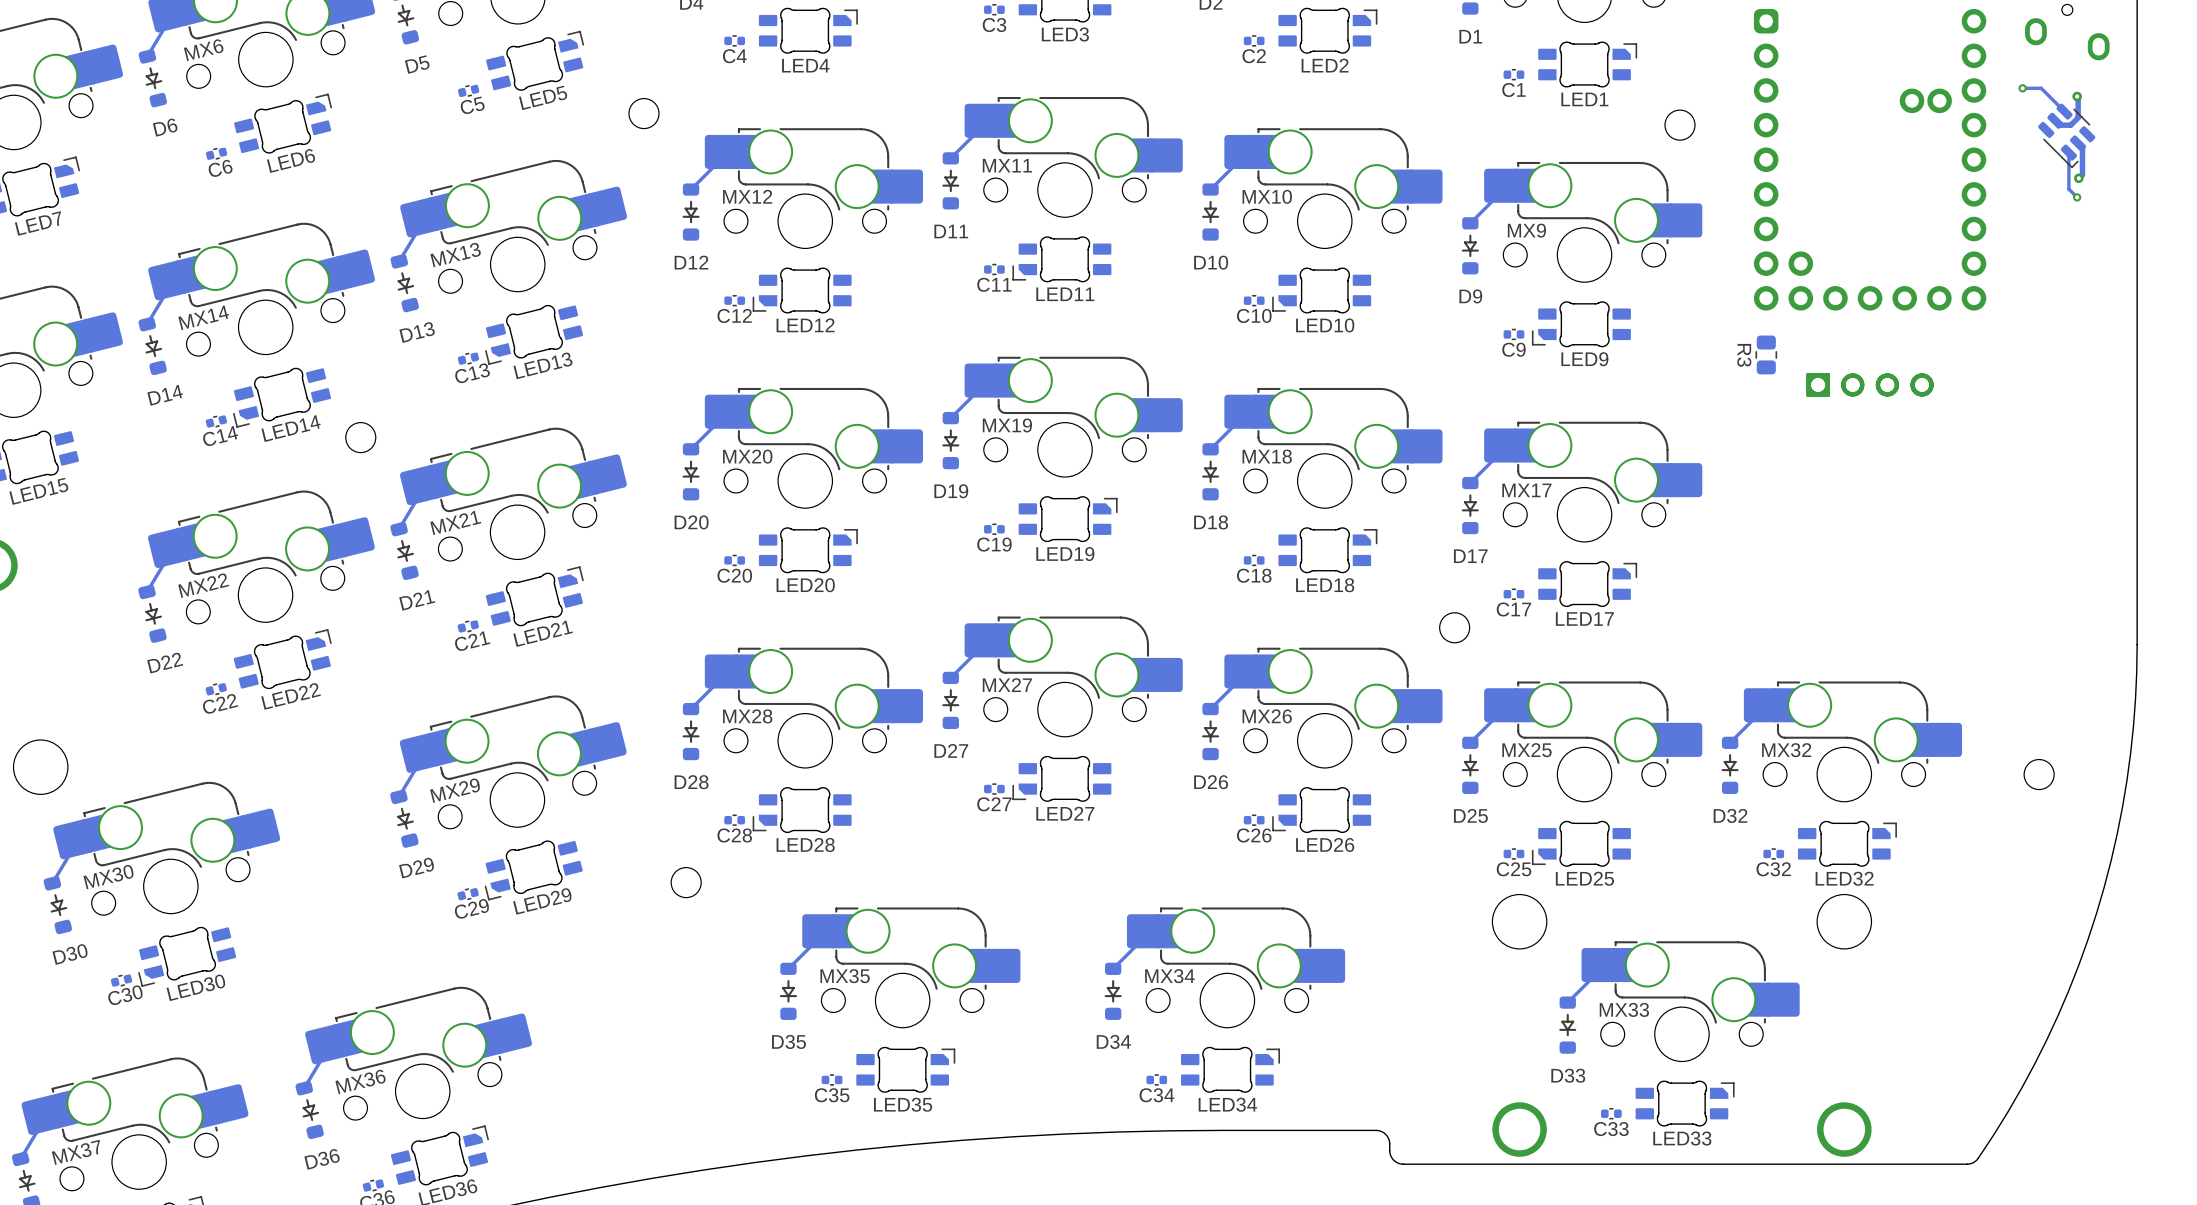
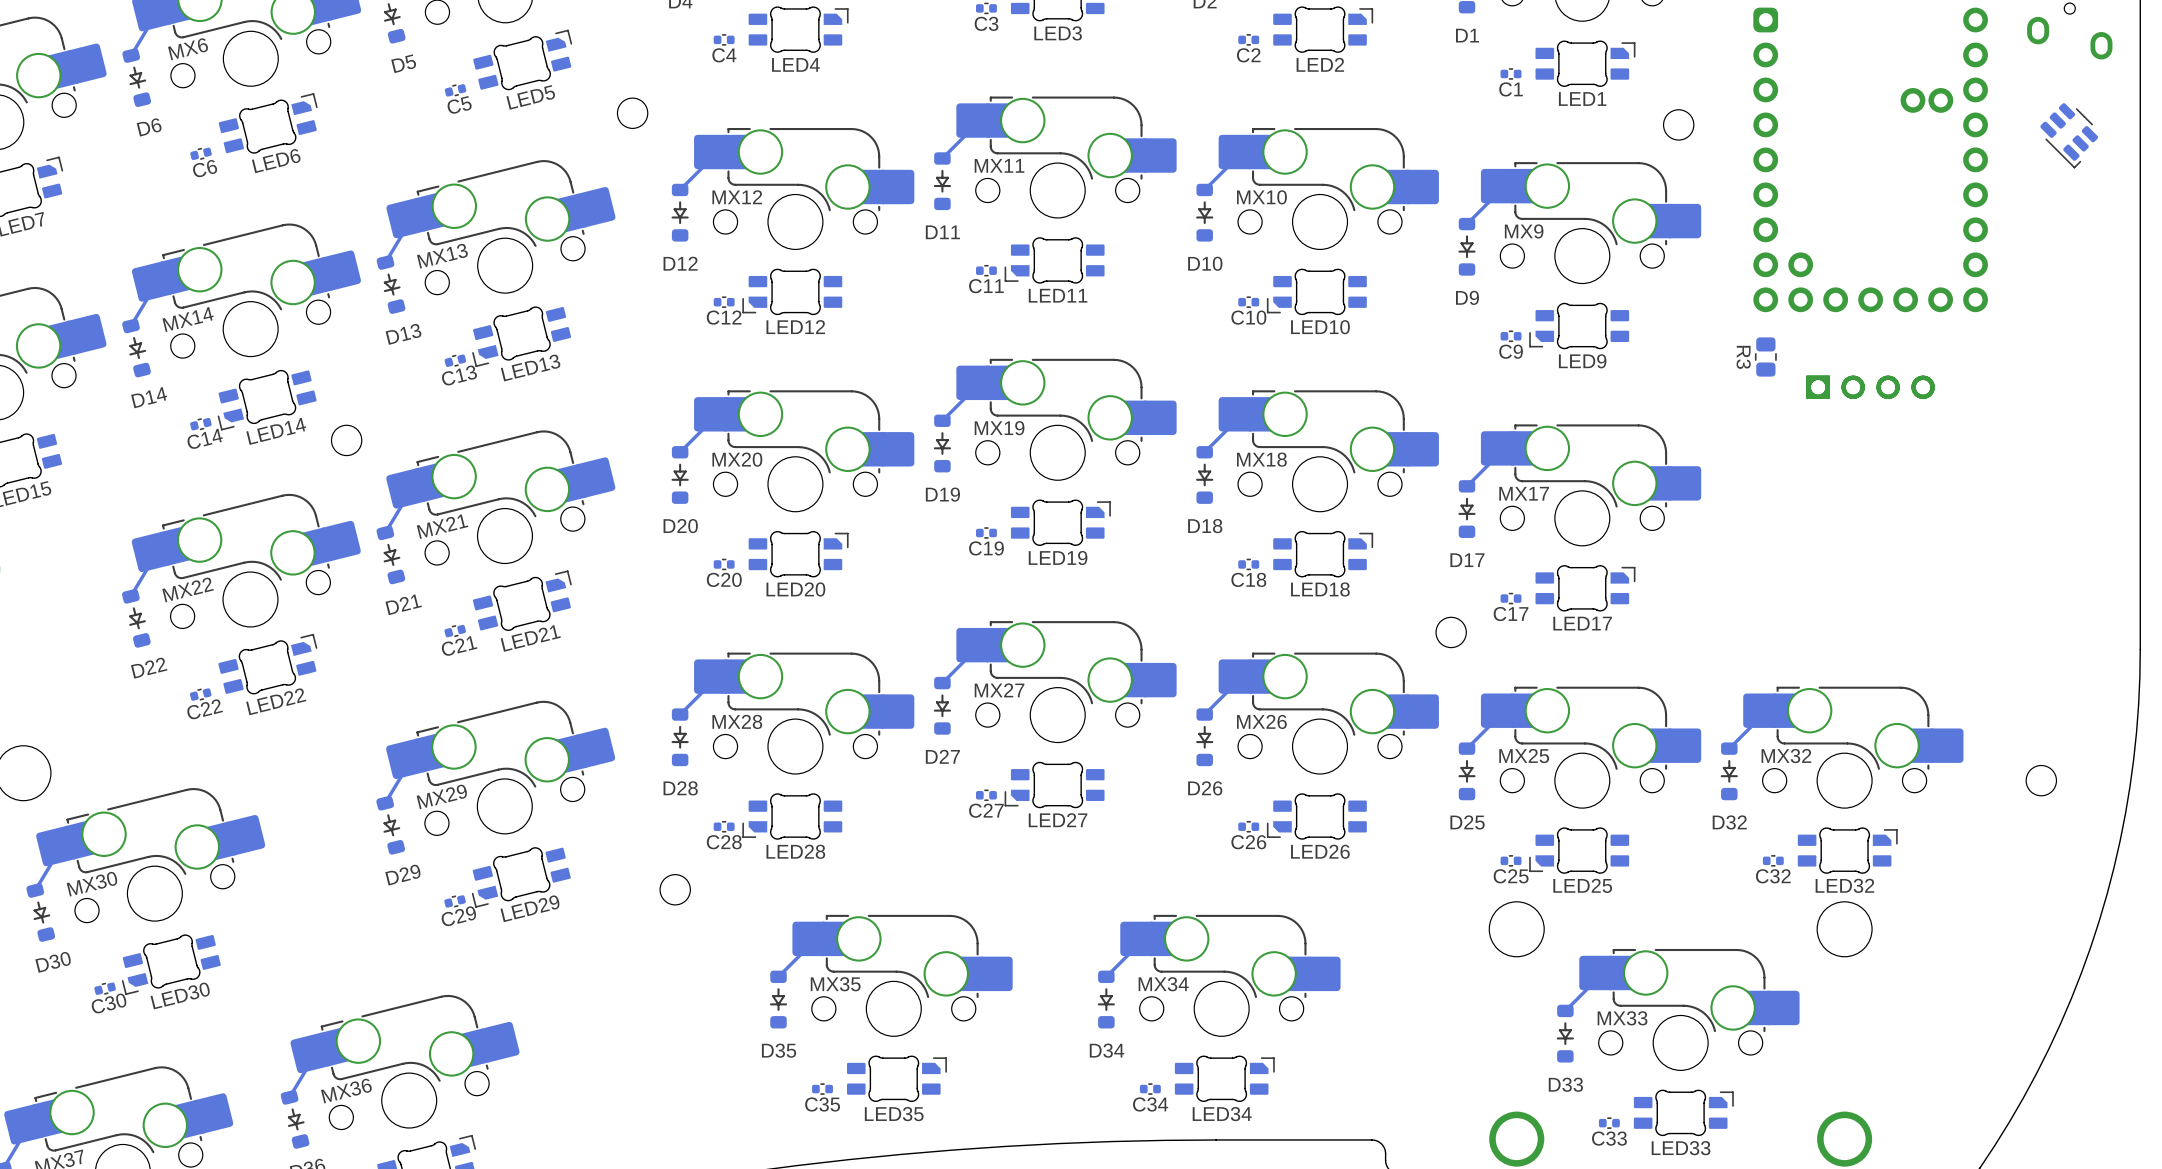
track: (2022, 88) (2041, 88) (2064, 111) -> none
via: (2022, 88) -> none
track: (2077, 96) (2078, 117) (2070, 125) (2059, 125) (2055, 120) -> none
via: (2077, 96) -> none
track: (2078, 143) (2082, 147) (2082, 174) (2078, 178) -> none
track: (2068, 152) (2068, 189) (2077, 197) -> none
via: (2078, 178) -> none
via: (2077, 197) -> none

